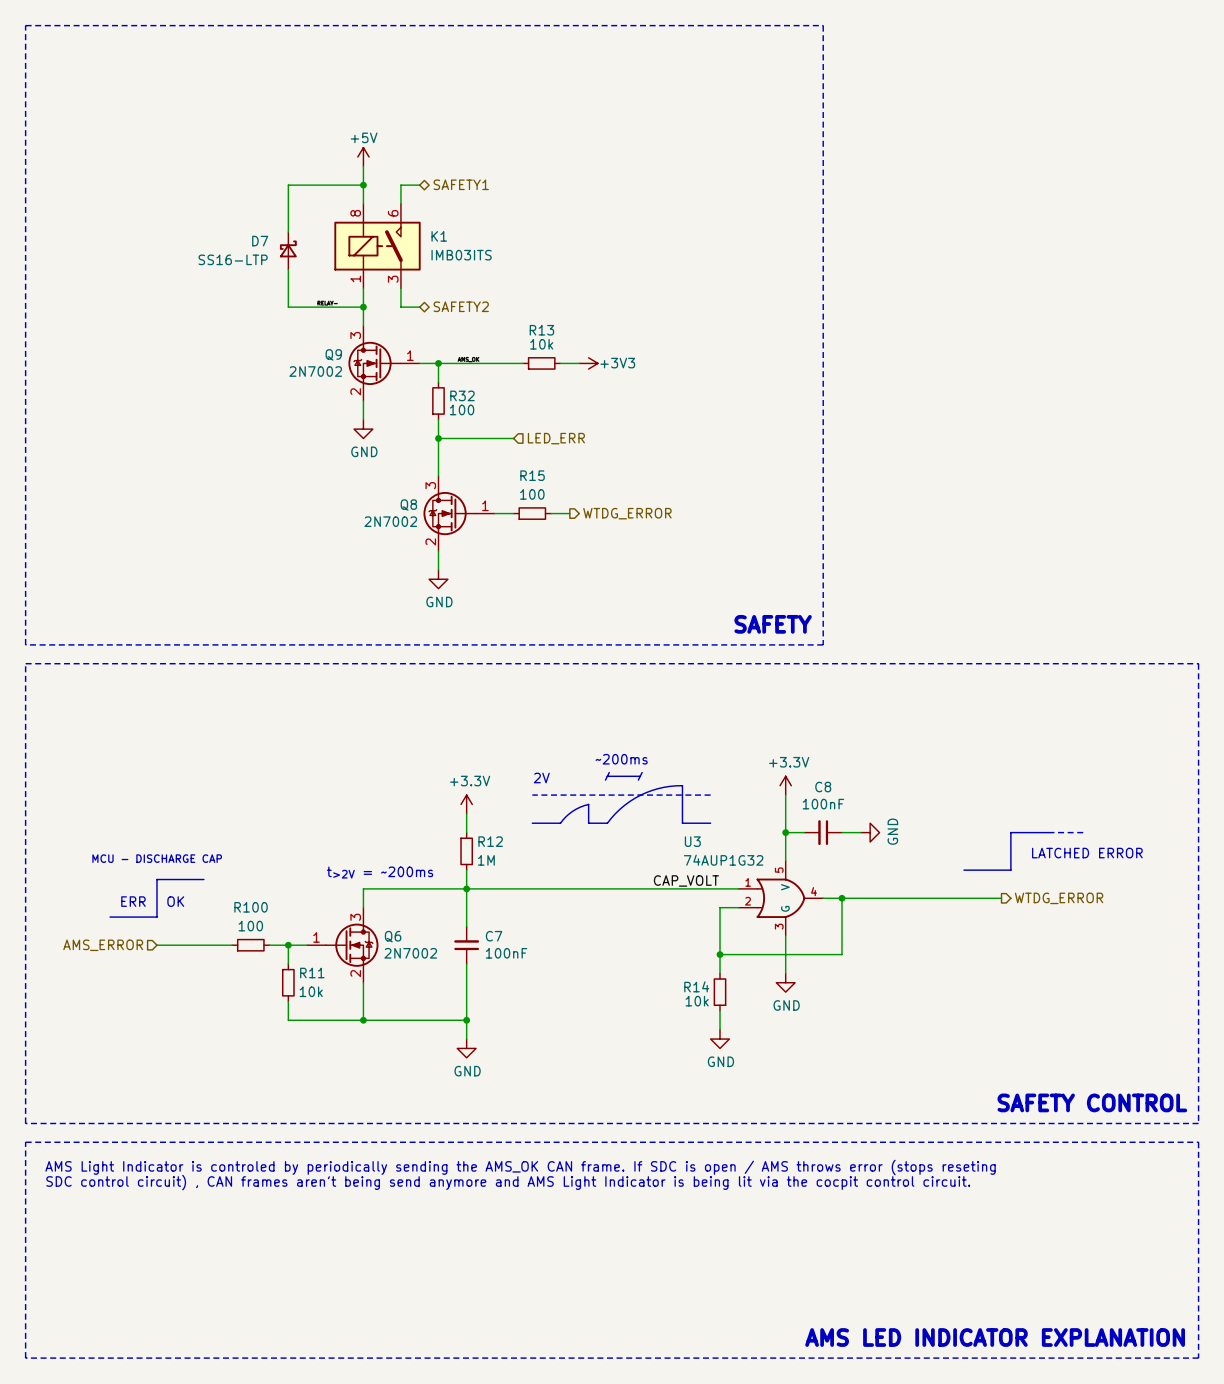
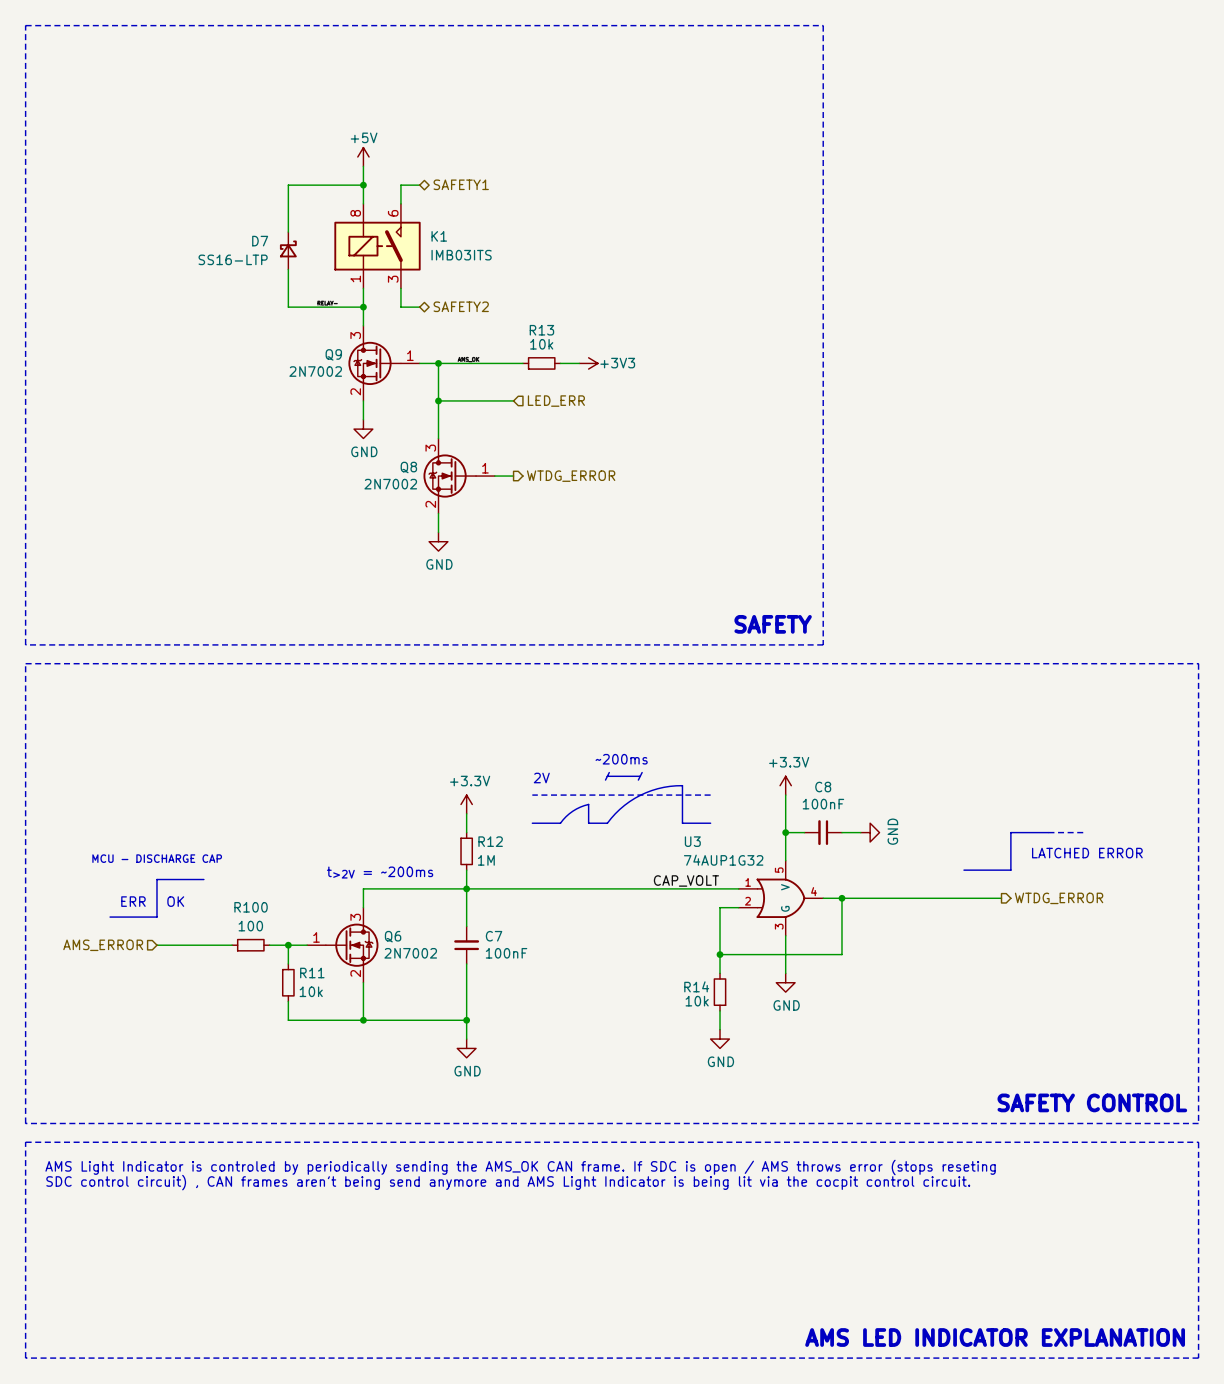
wire: none -> (438, 382) (438, 419)
wire: none -> (438, 400) (513, 400)
R32: 100 (438, 400) -> none
junction position: (438, 438) -> (438, 400)
wire: (513, 438) (438, 438) (438, 476) -> none
hierarchical label position: LED_ERR (556, 438) -> LED_ERR (556, 401)
Q8 position: (459, 513) -> (459, 476)
wire: (494, 513) (513, 513) -> (494, 476) (513, 476)
R15: 100 (532, 513) -> none
wire: (551, 513) (569, 513) -> none
hierarchical label position: WTDG_ERROR (627, 513) -> WTDG_ERROR (571, 476)
power symbol position: GND (438, 579) -> GND (438, 541)

